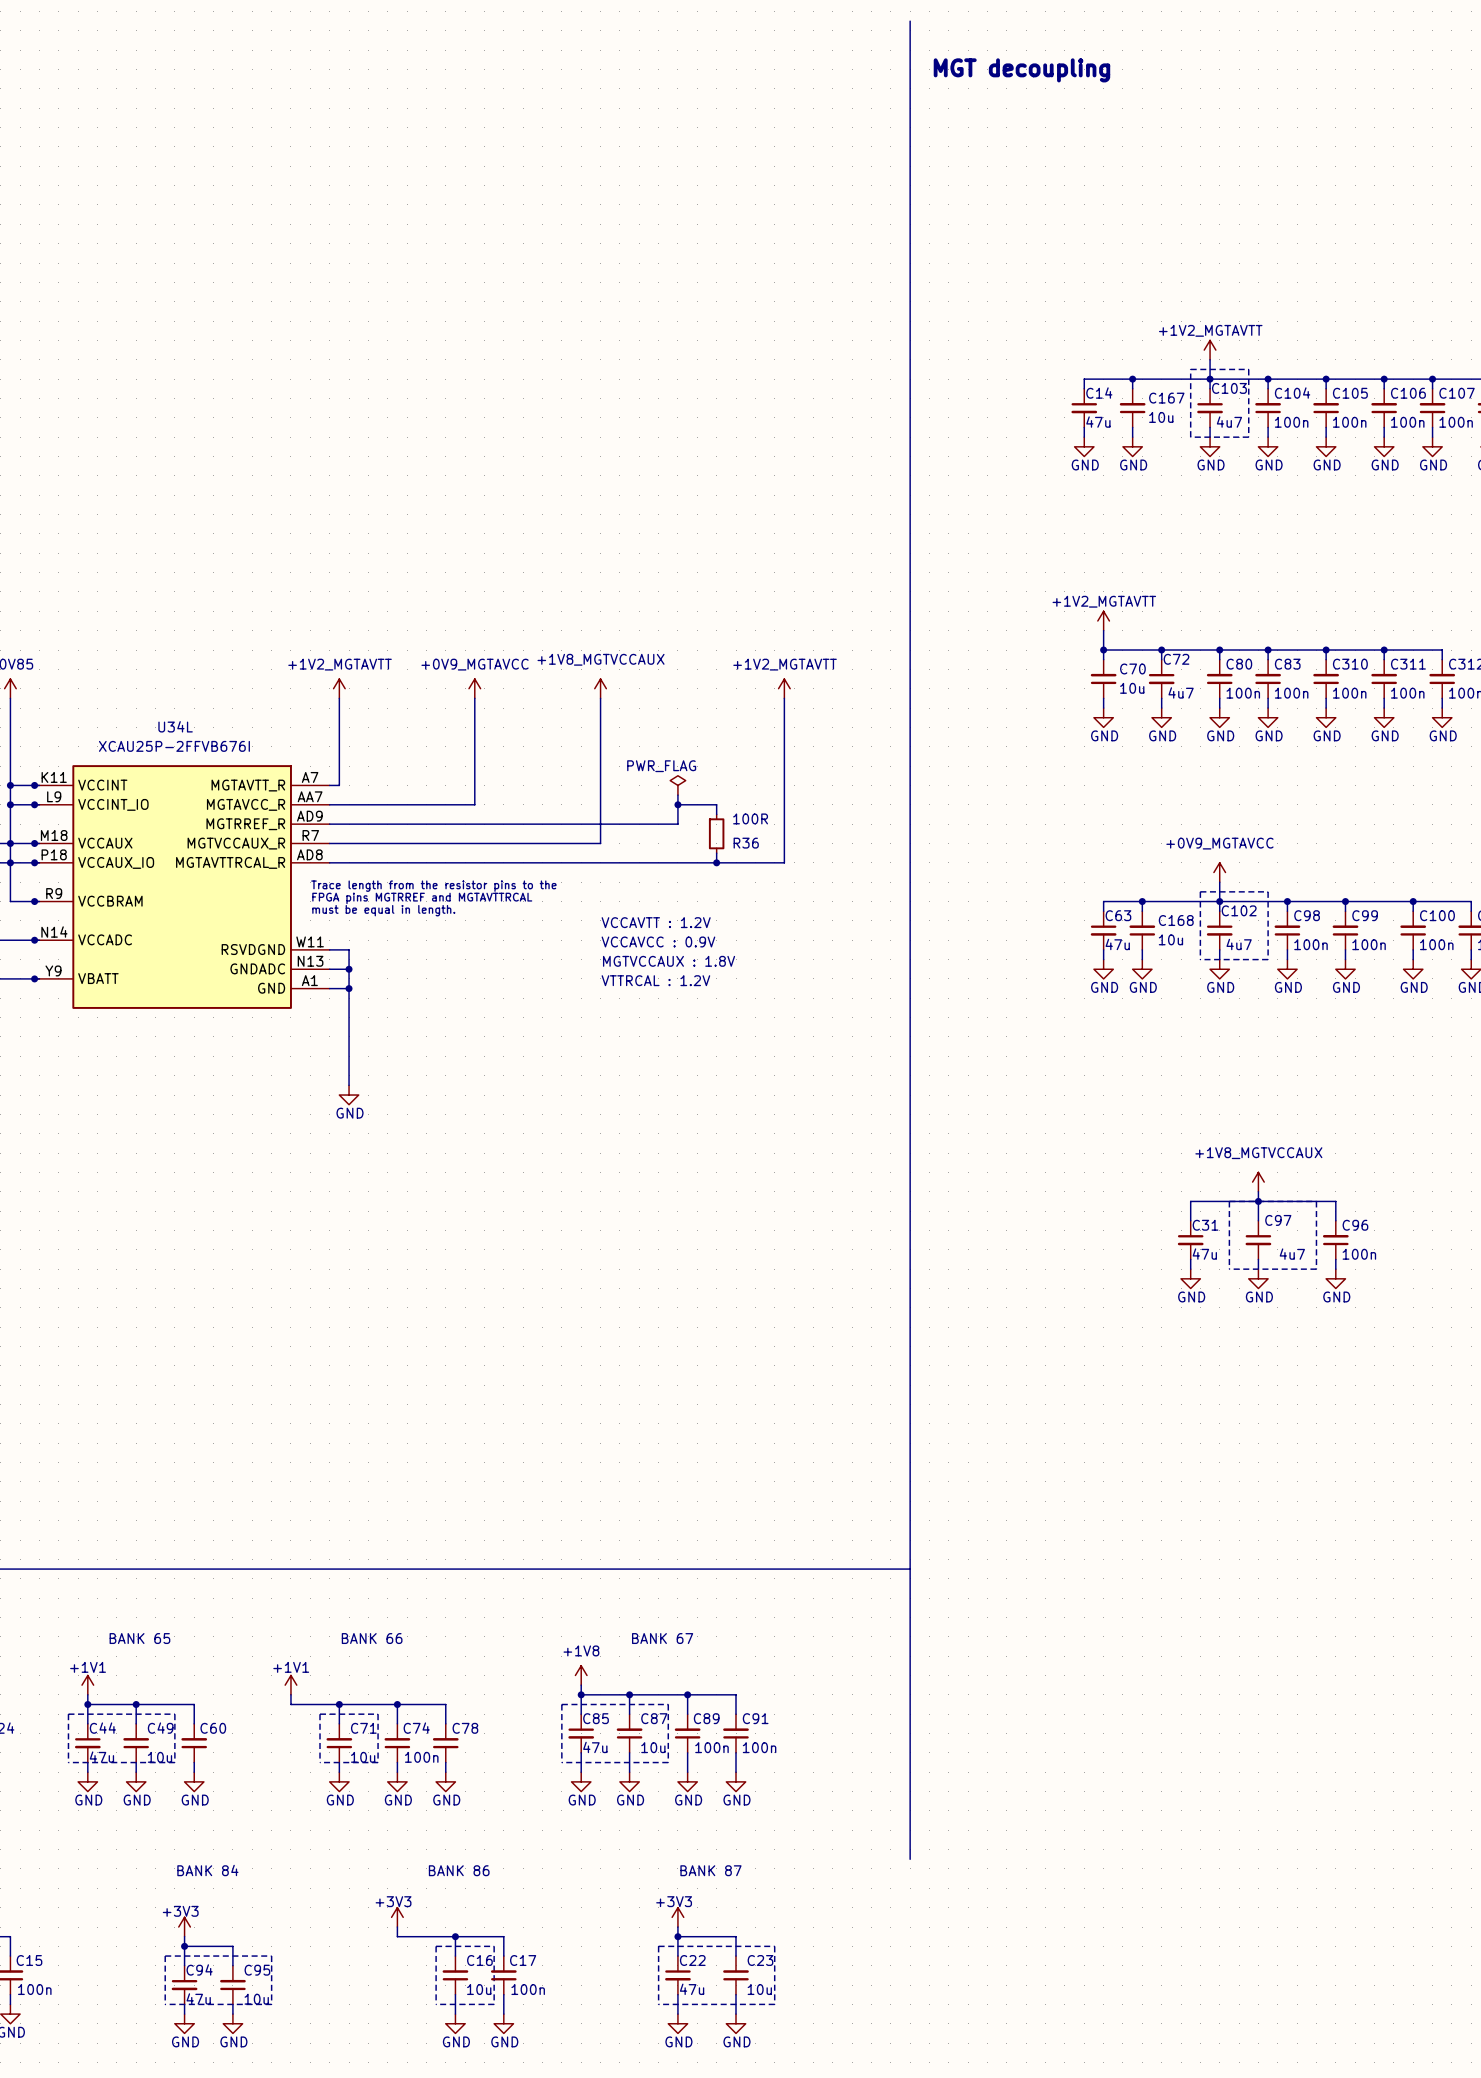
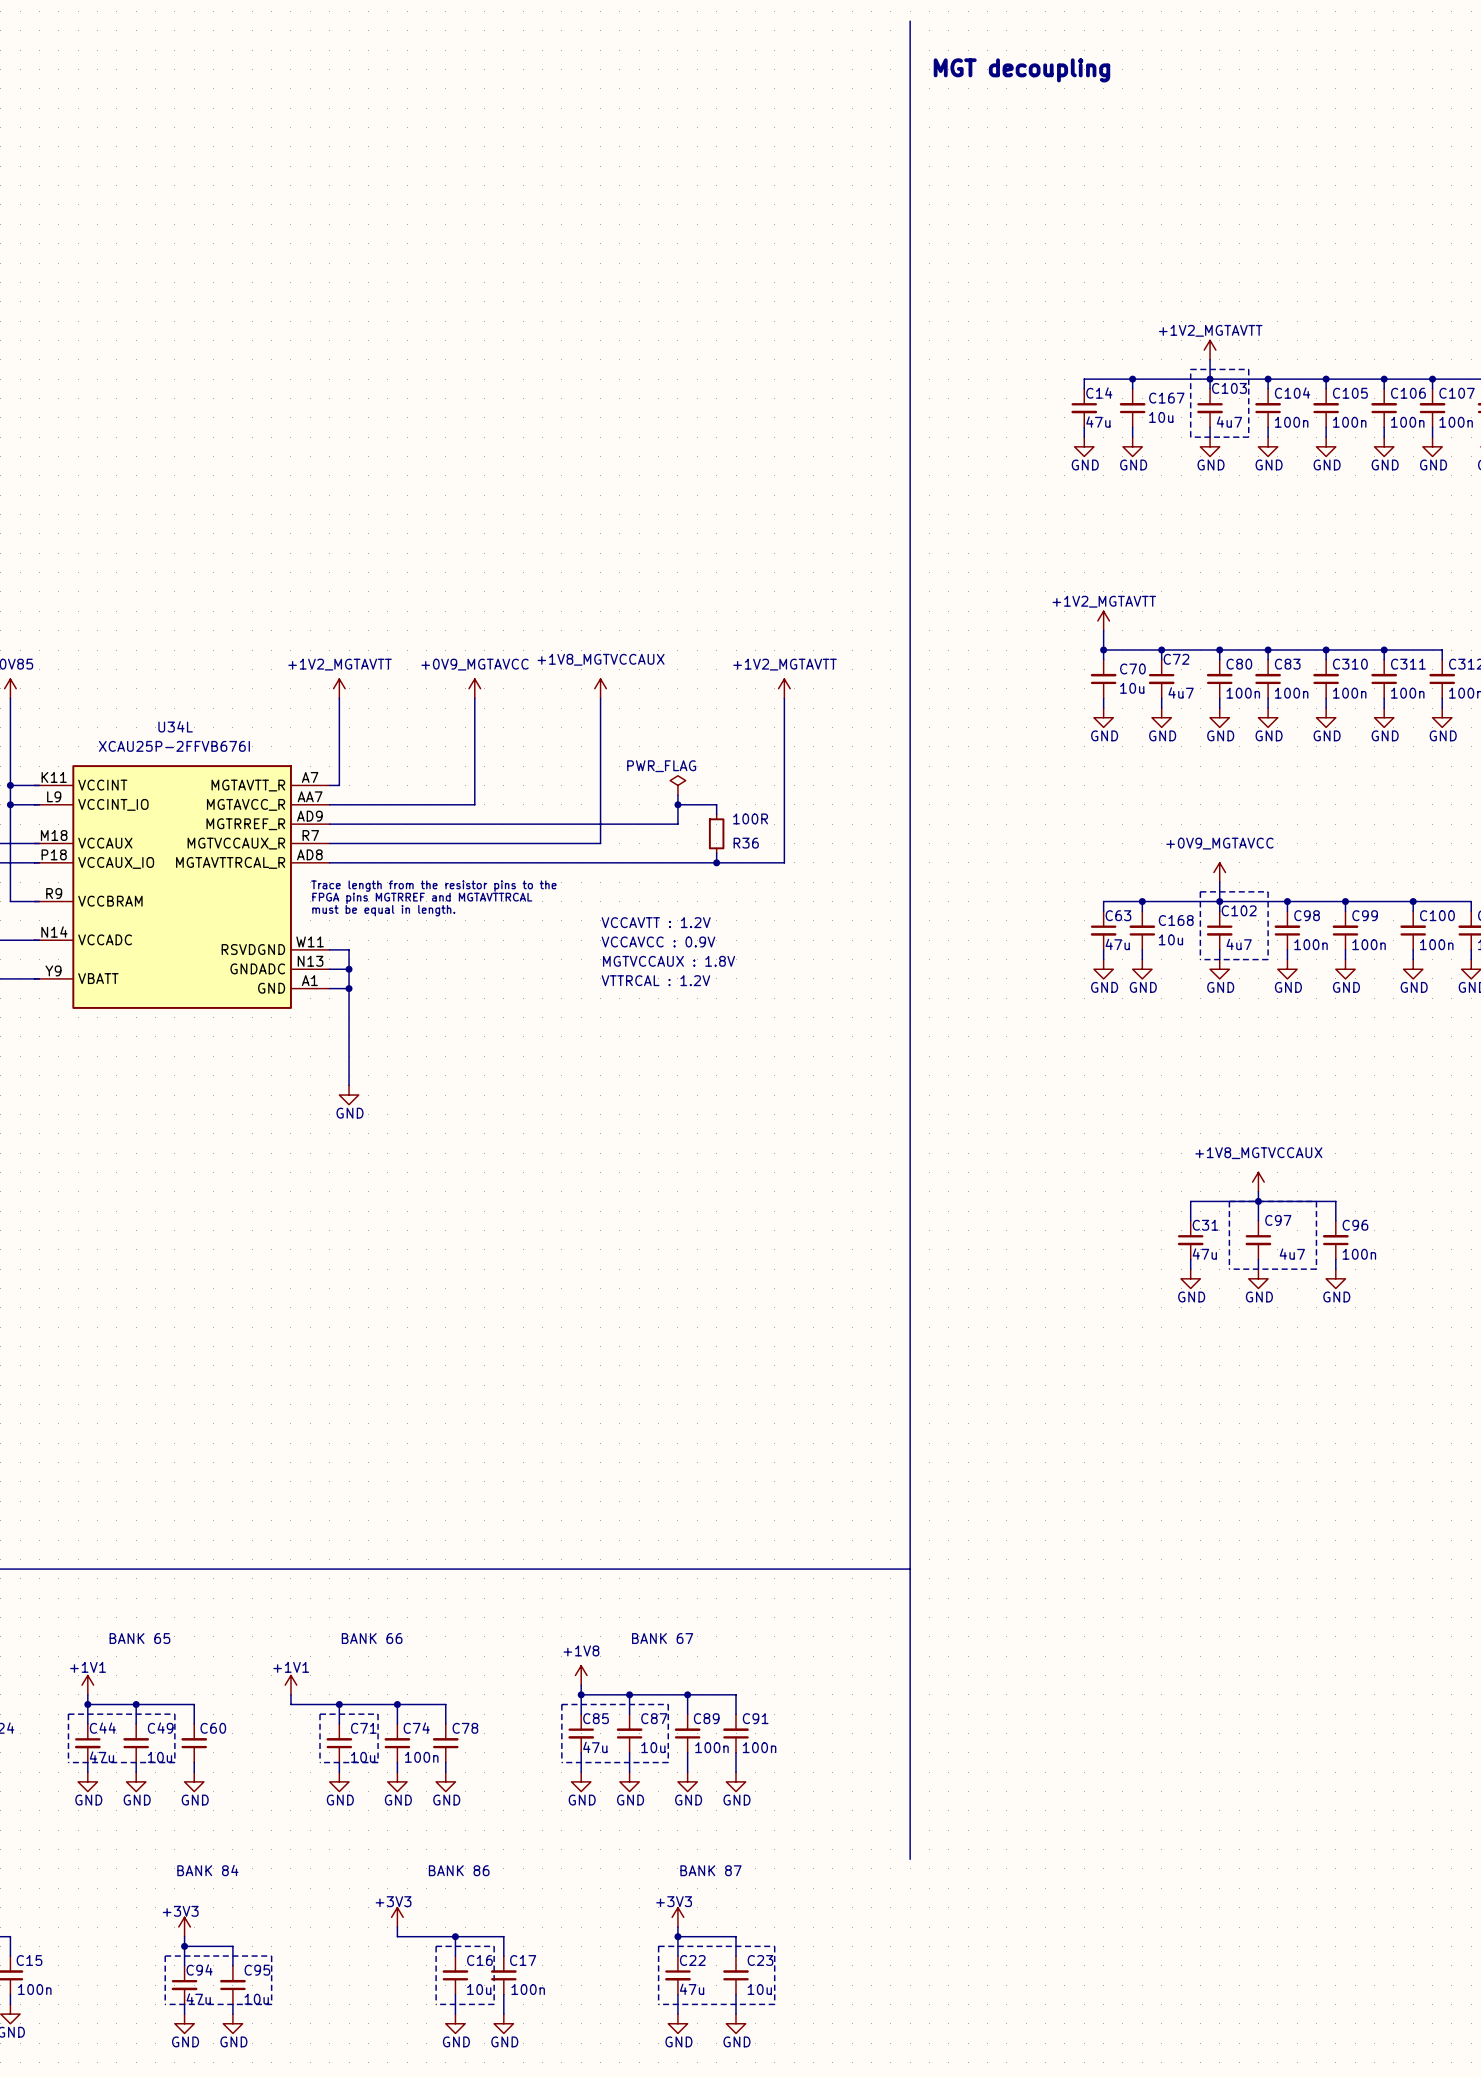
junction: (34, 785) -> none
junction: (34, 804) -> none
junction: (10, 843) -> none
junction: (34, 843) -> none
junction: (10, 862) -> none
junction: (34, 862) -> none
junction: (34, 901) -> none
junction: (34, 940) -> none
junction: (34, 978) -> none

